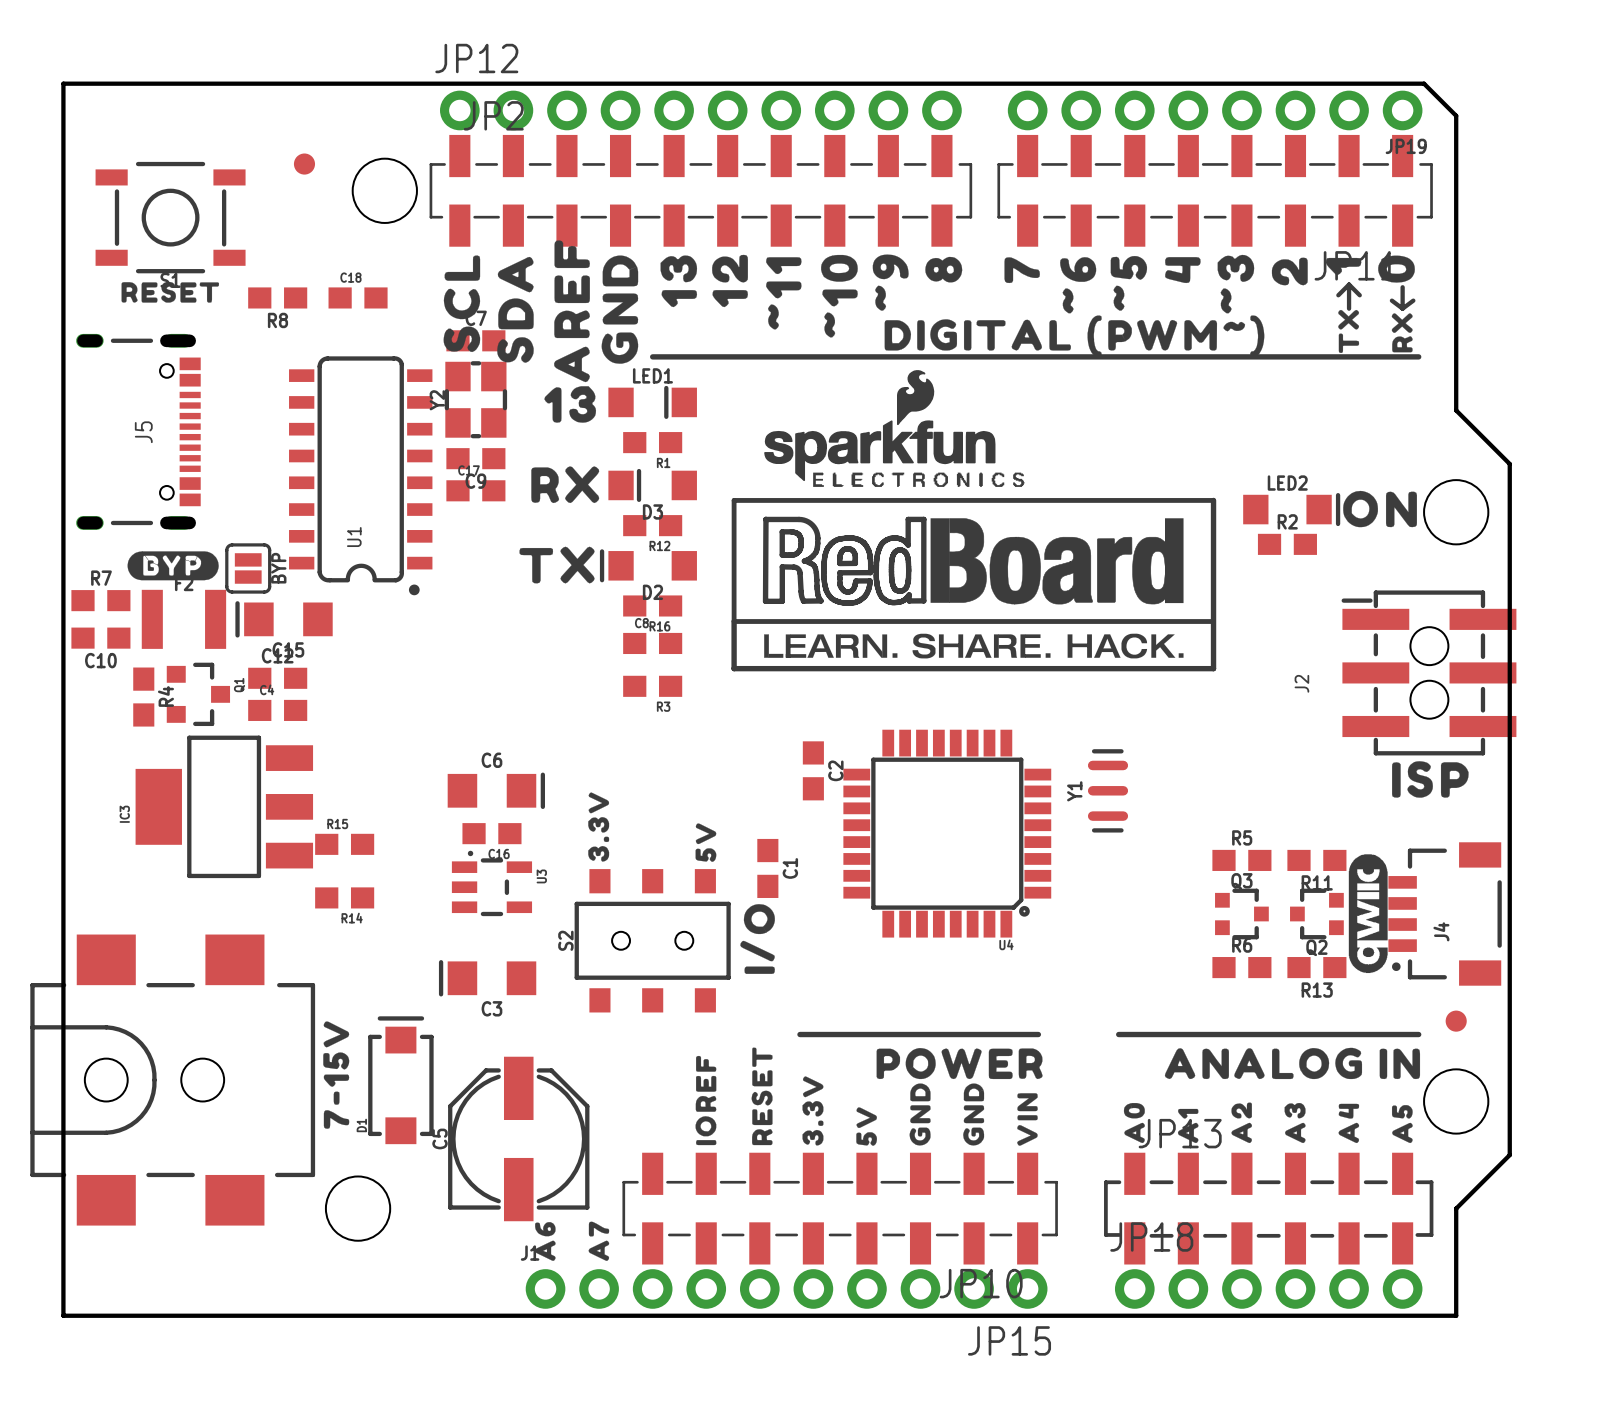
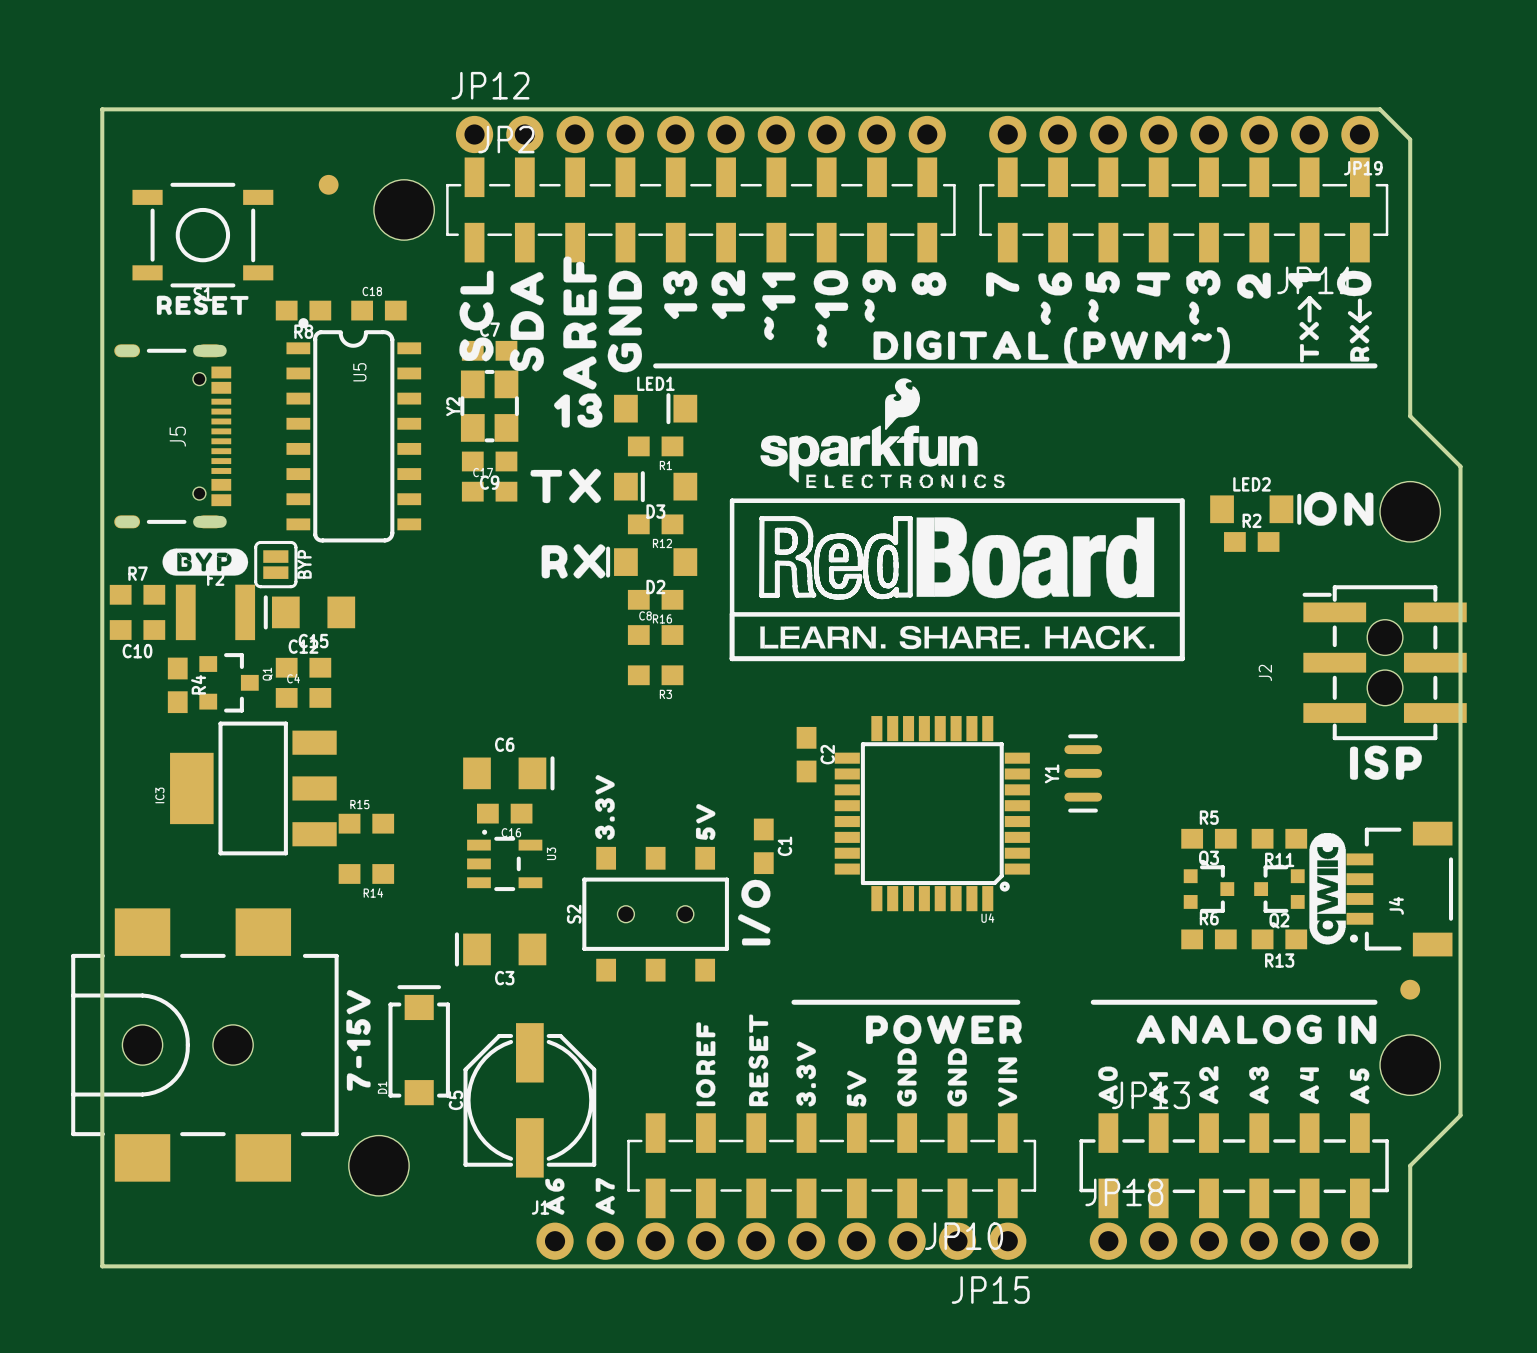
U5: none -> (353, 430)
U1: (360, 475) -> none
drawing position: (565, 484) -> (573, 561)
drawing position: (557, 565) -> (565, 485)

